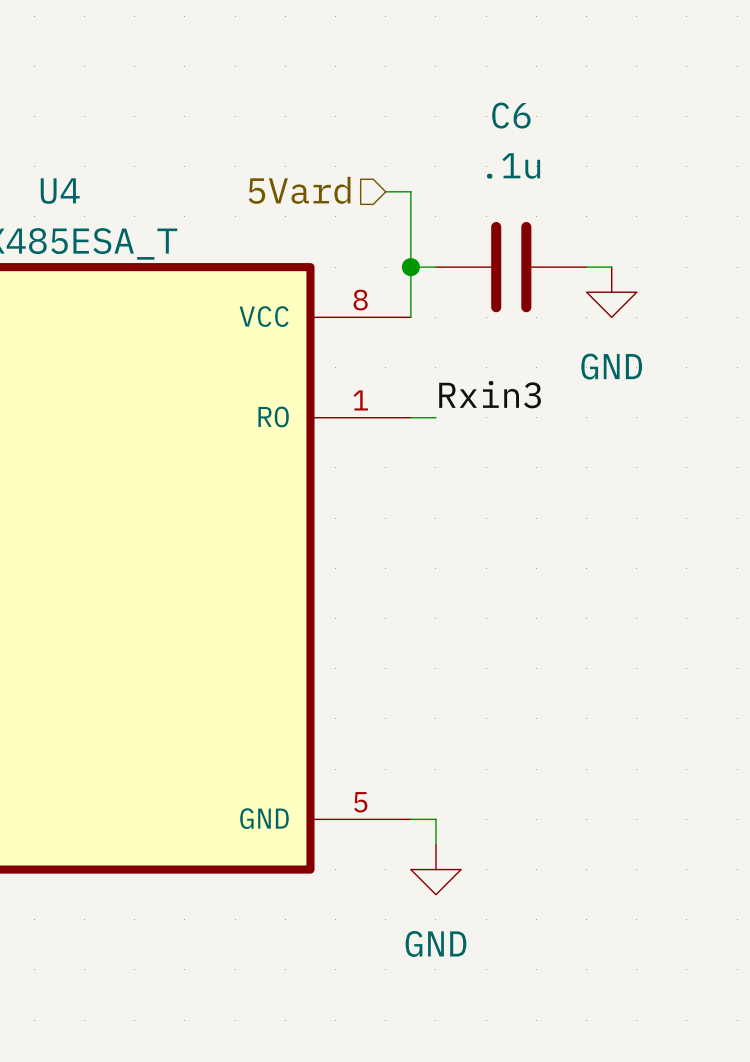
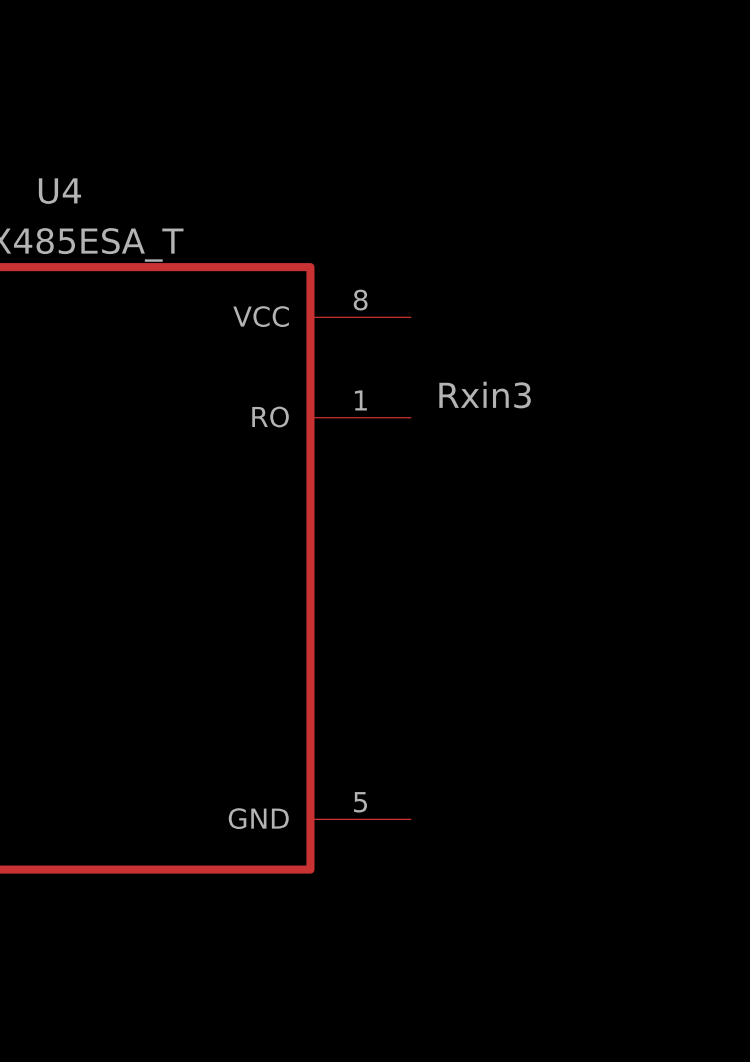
hierarchical label: 5Vard (299, 190) -> none
wire: (385, 191) (410, 191) (410, 317) -> none
wire: (410, 267) (435, 267) -> none
junction: (410, 267) -> none
C6: .1u (511, 267) -> none
wire: (586, 267) (611, 267) -> none
power symbol: GND (611, 292) -> none
wire: (410, 417) (435, 417) -> none
wire: (410, 819) (435, 819) (435, 844) -> none
power symbol: GND (435, 869) -> none

